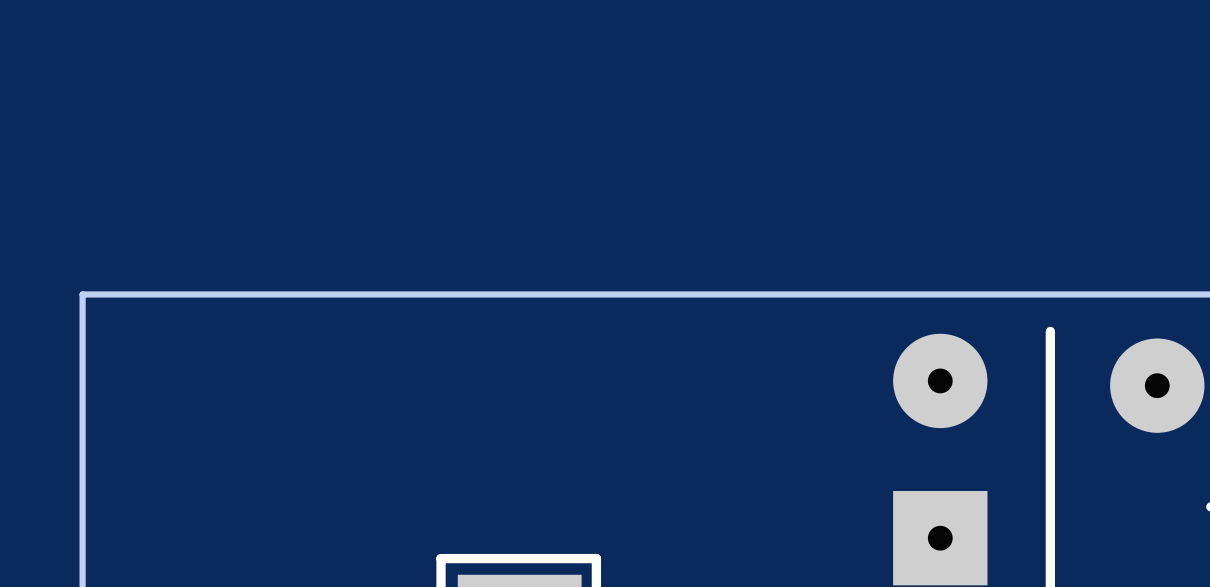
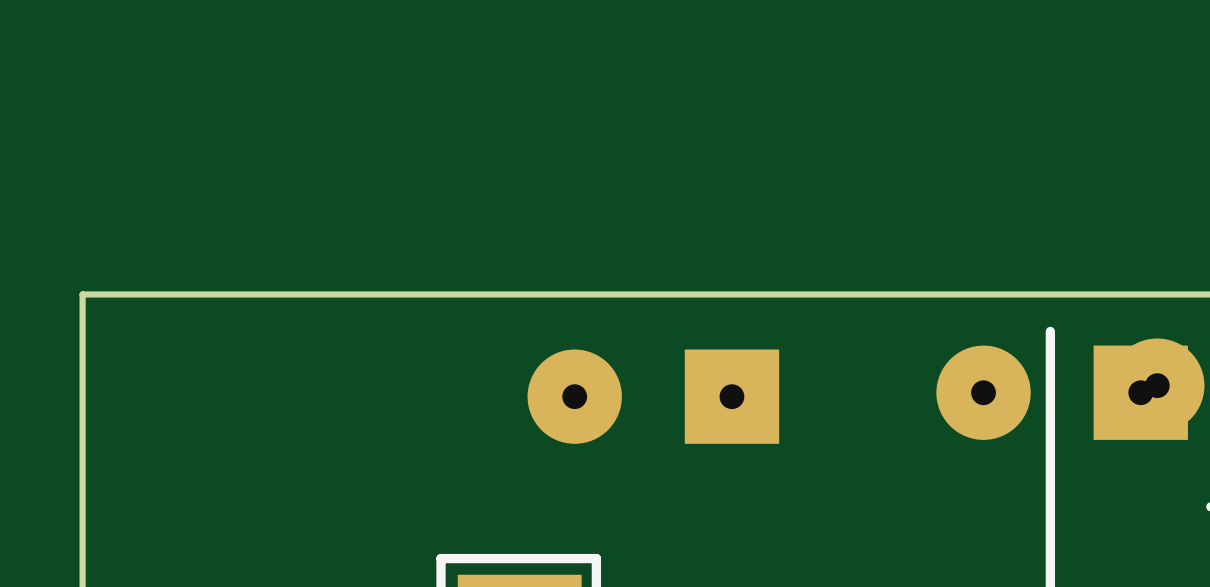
part: none -> (653, 396)
part rotation: 0° (940, 459) -> 90° counterclockwise (1062, 392)

